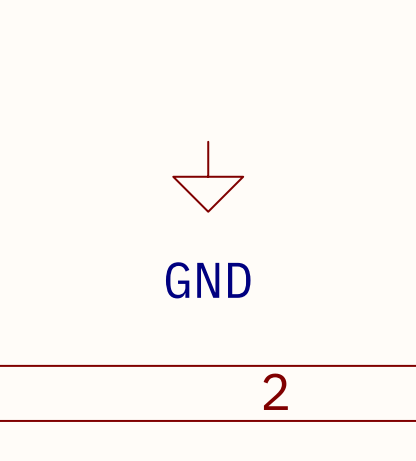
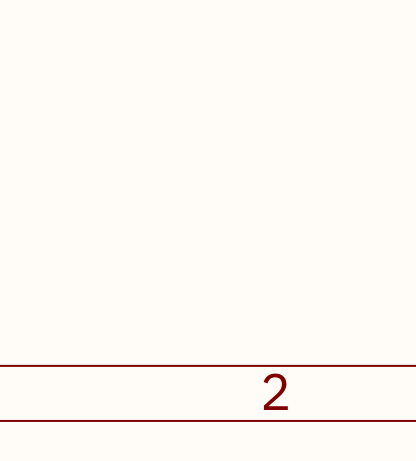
power symbol: GND (208, 176) -> none

